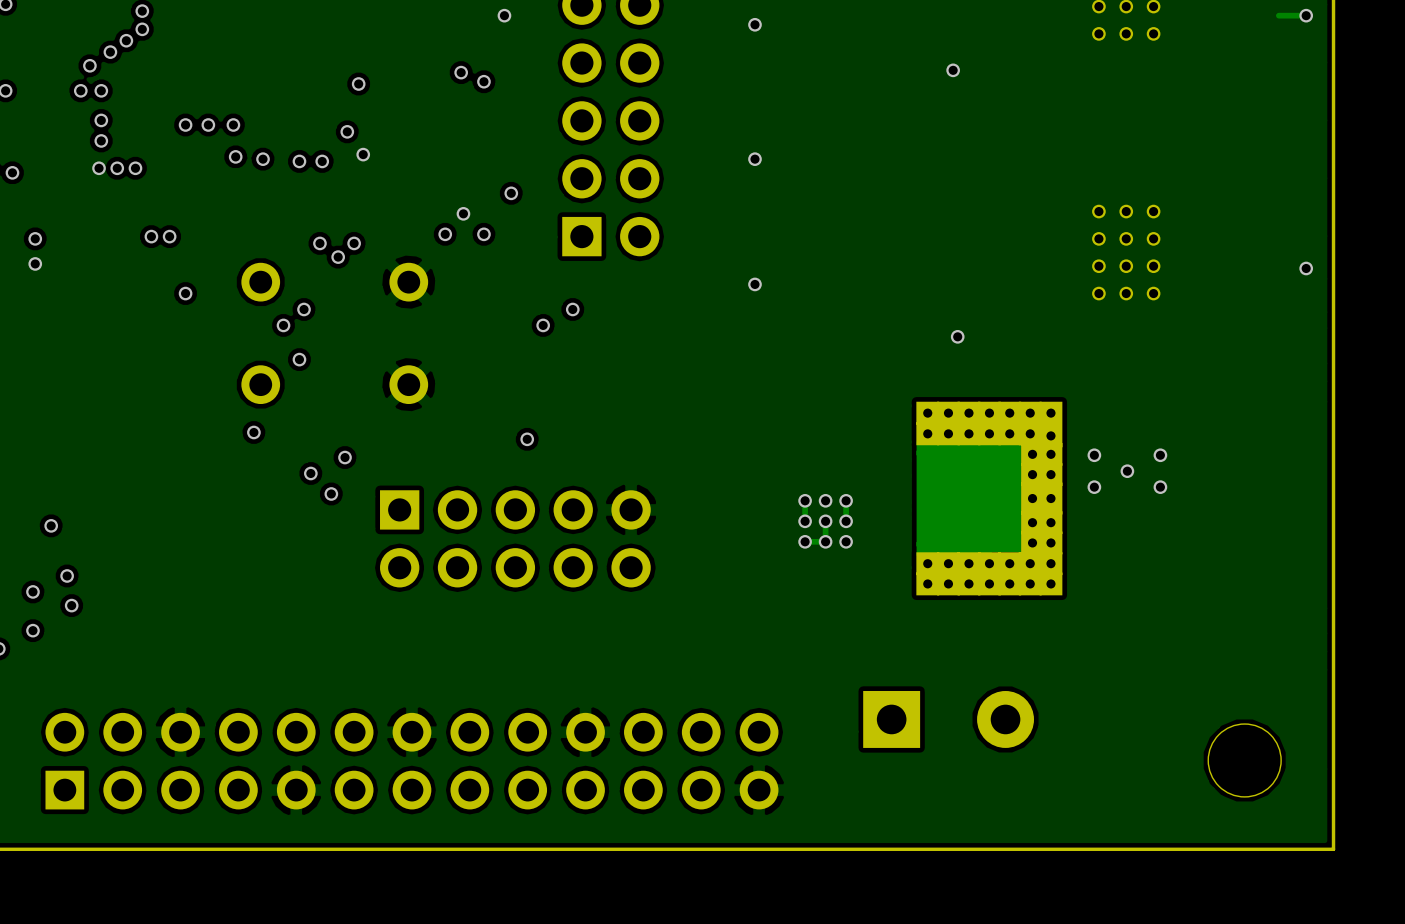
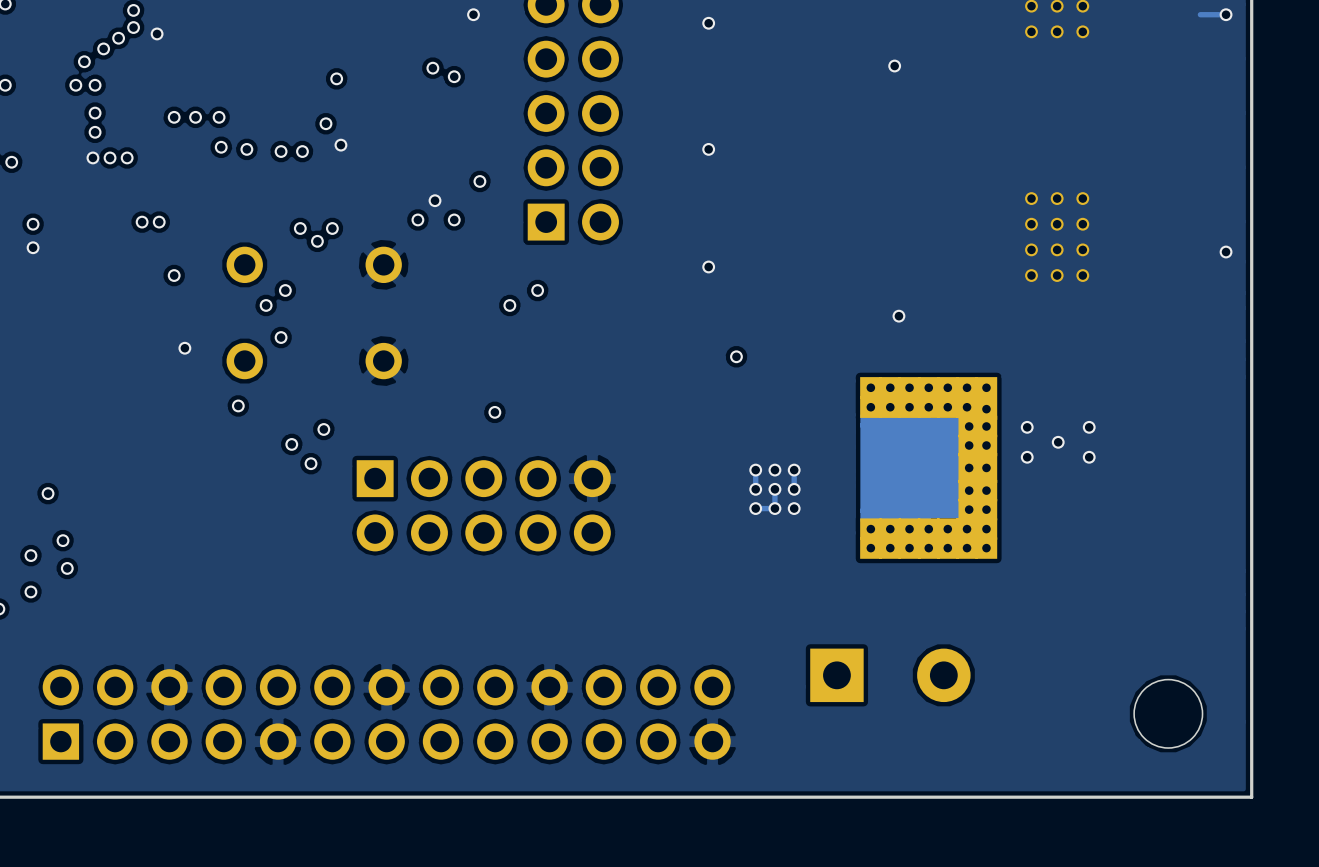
via: none -> (157, 33)
via: none -> (184, 348)
via: none -> (736, 356)

